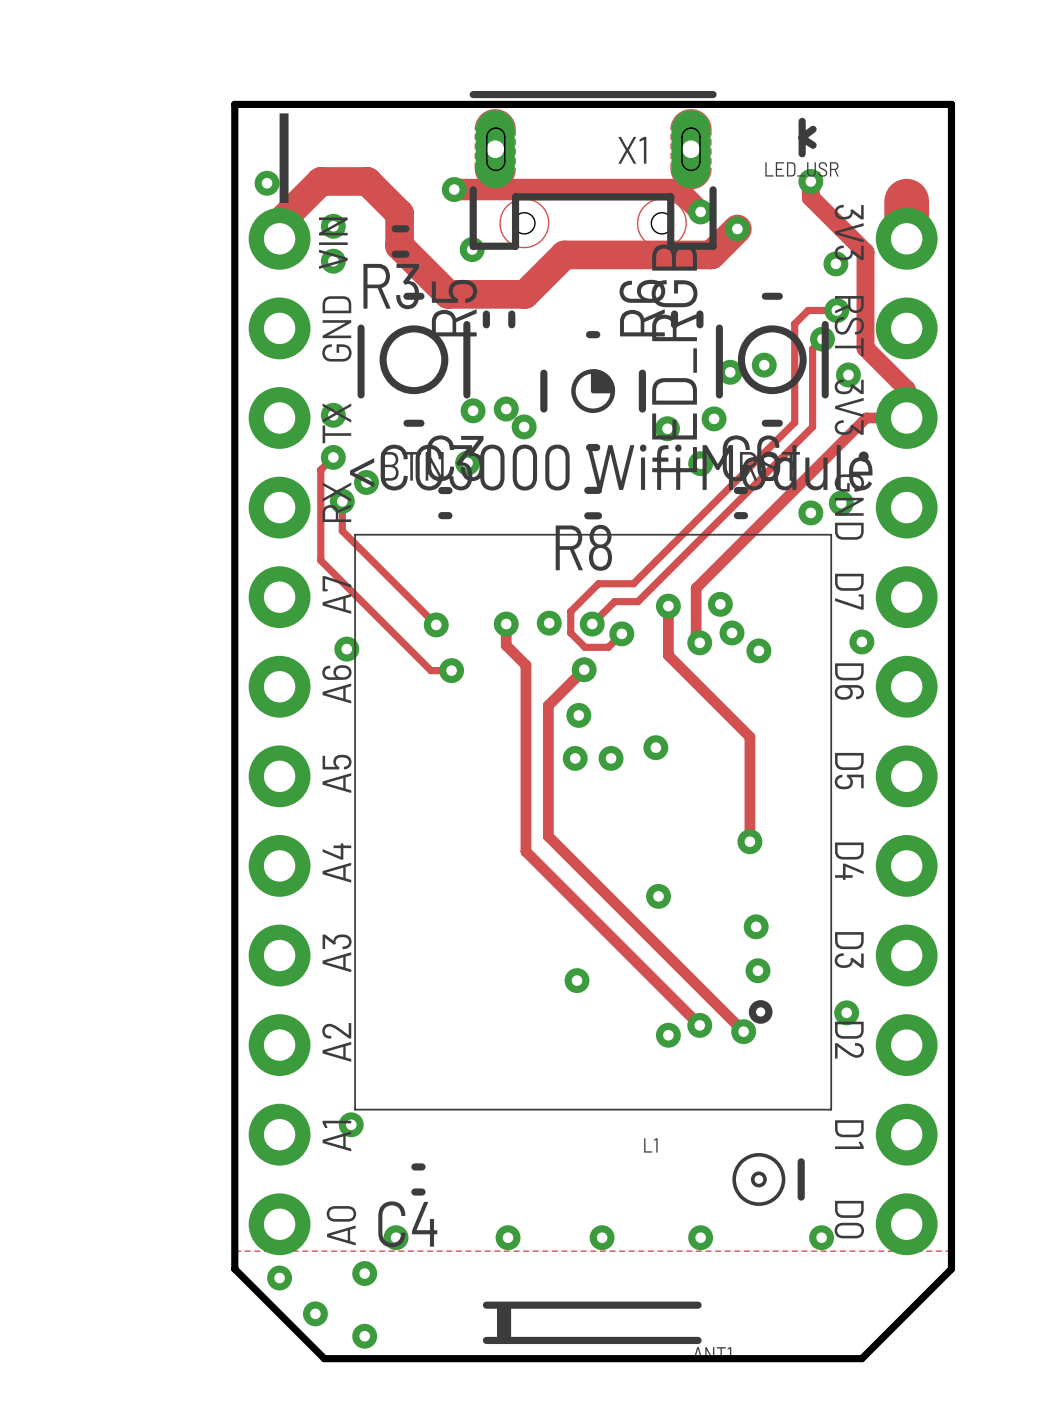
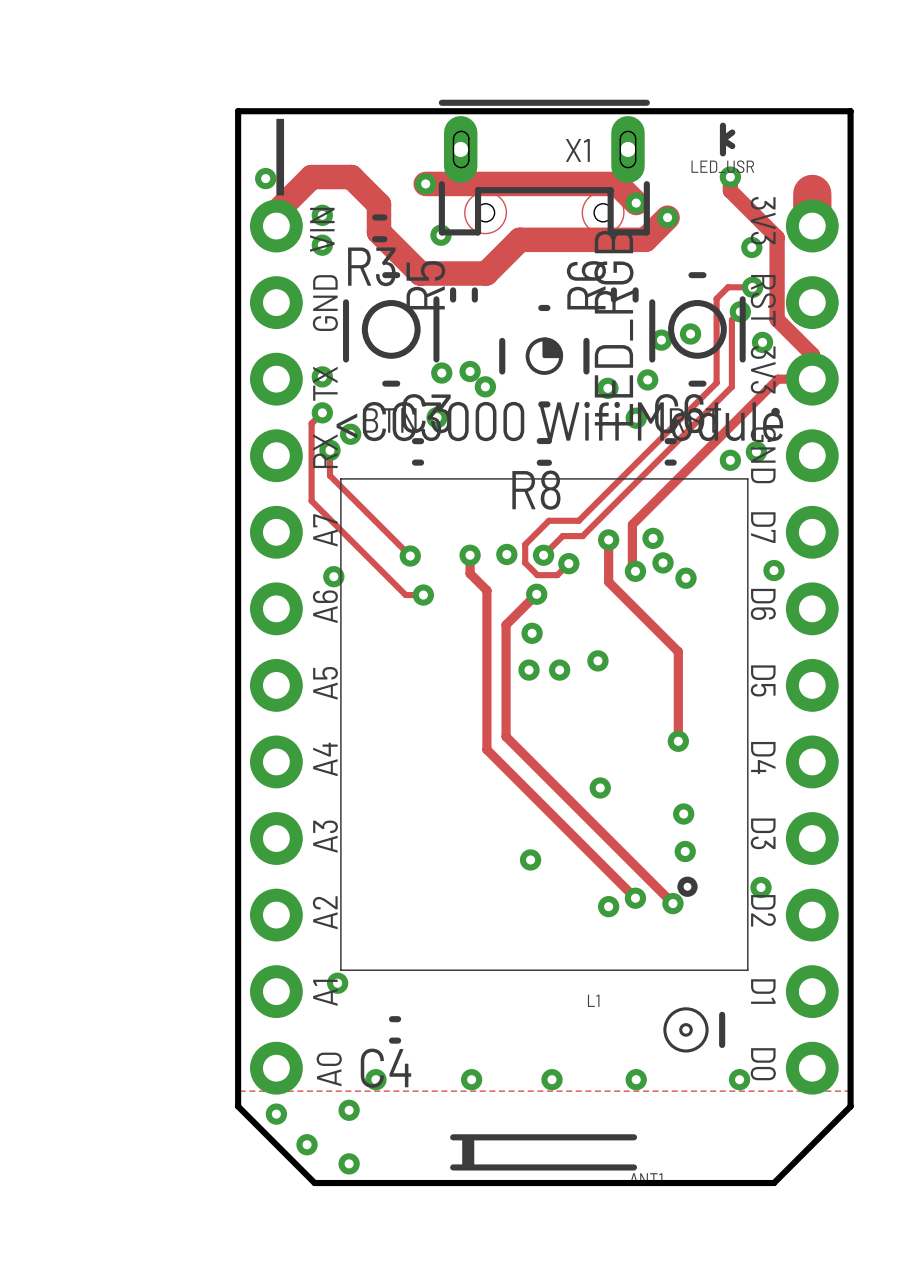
zone outline: (495, 109) (483, 113) (476, 124) (475, 168) (476, 176) (481, 182) (487, 187) (495, 188) (503, 187) (509, 182) (513, 176) (515, 168) (514, 124) (507, 113) (495, 109) -> none
zone outline: (690, 109) (678, 113) (671, 124) (671, 168) (672, 176) (676, 182) (683, 187) (691, 188) (698, 187) (705, 182) (709, 176) (710, 168) (710, 124) (703, 113) (691, 109) -> none
track width: thin (454, 189) (678, 189) (700, 211) -> thick (425, 183) (617, 183) (636, 203)

